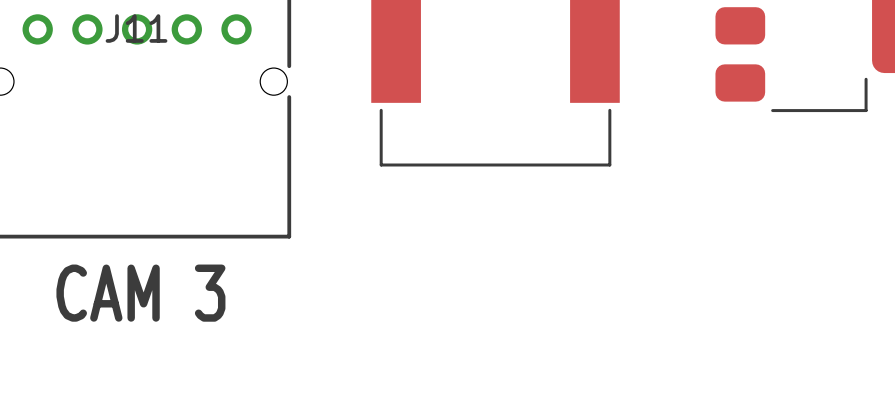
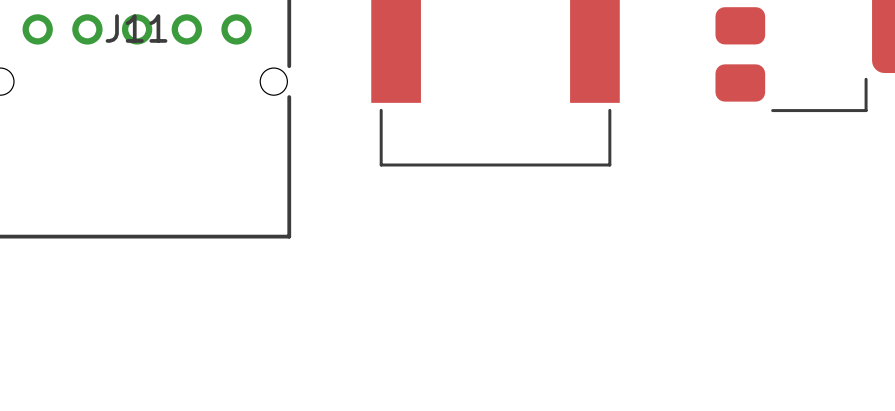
text: CAM 3 (140, 293) -> none

